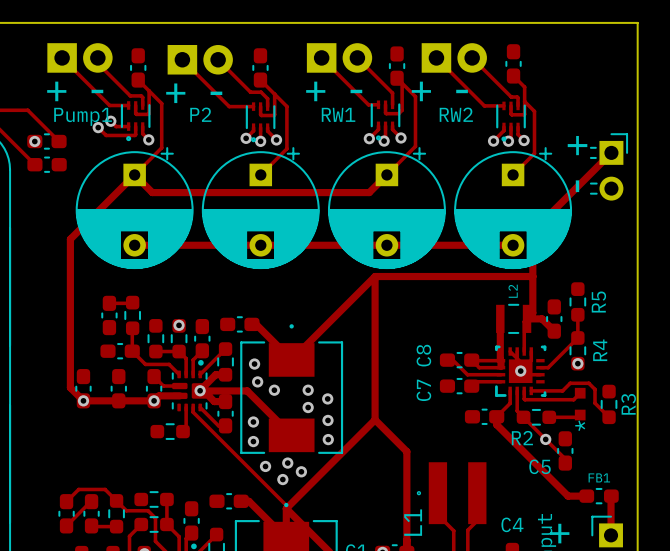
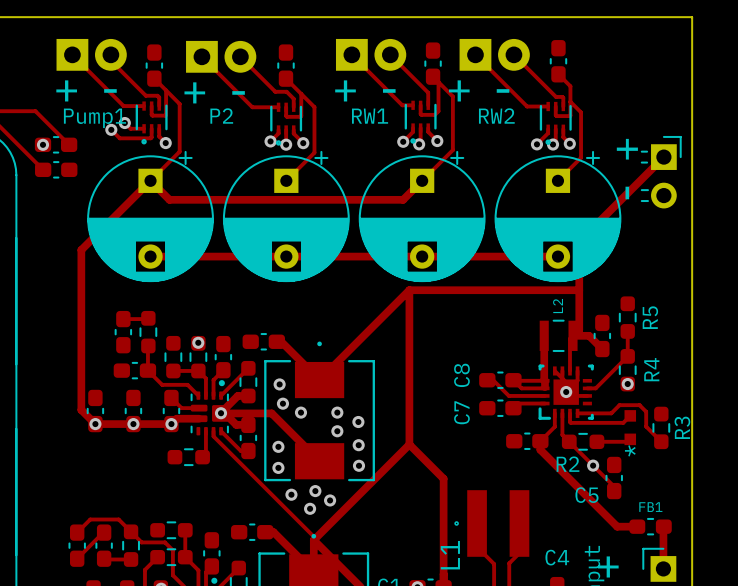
via: none -> (133, 424)

